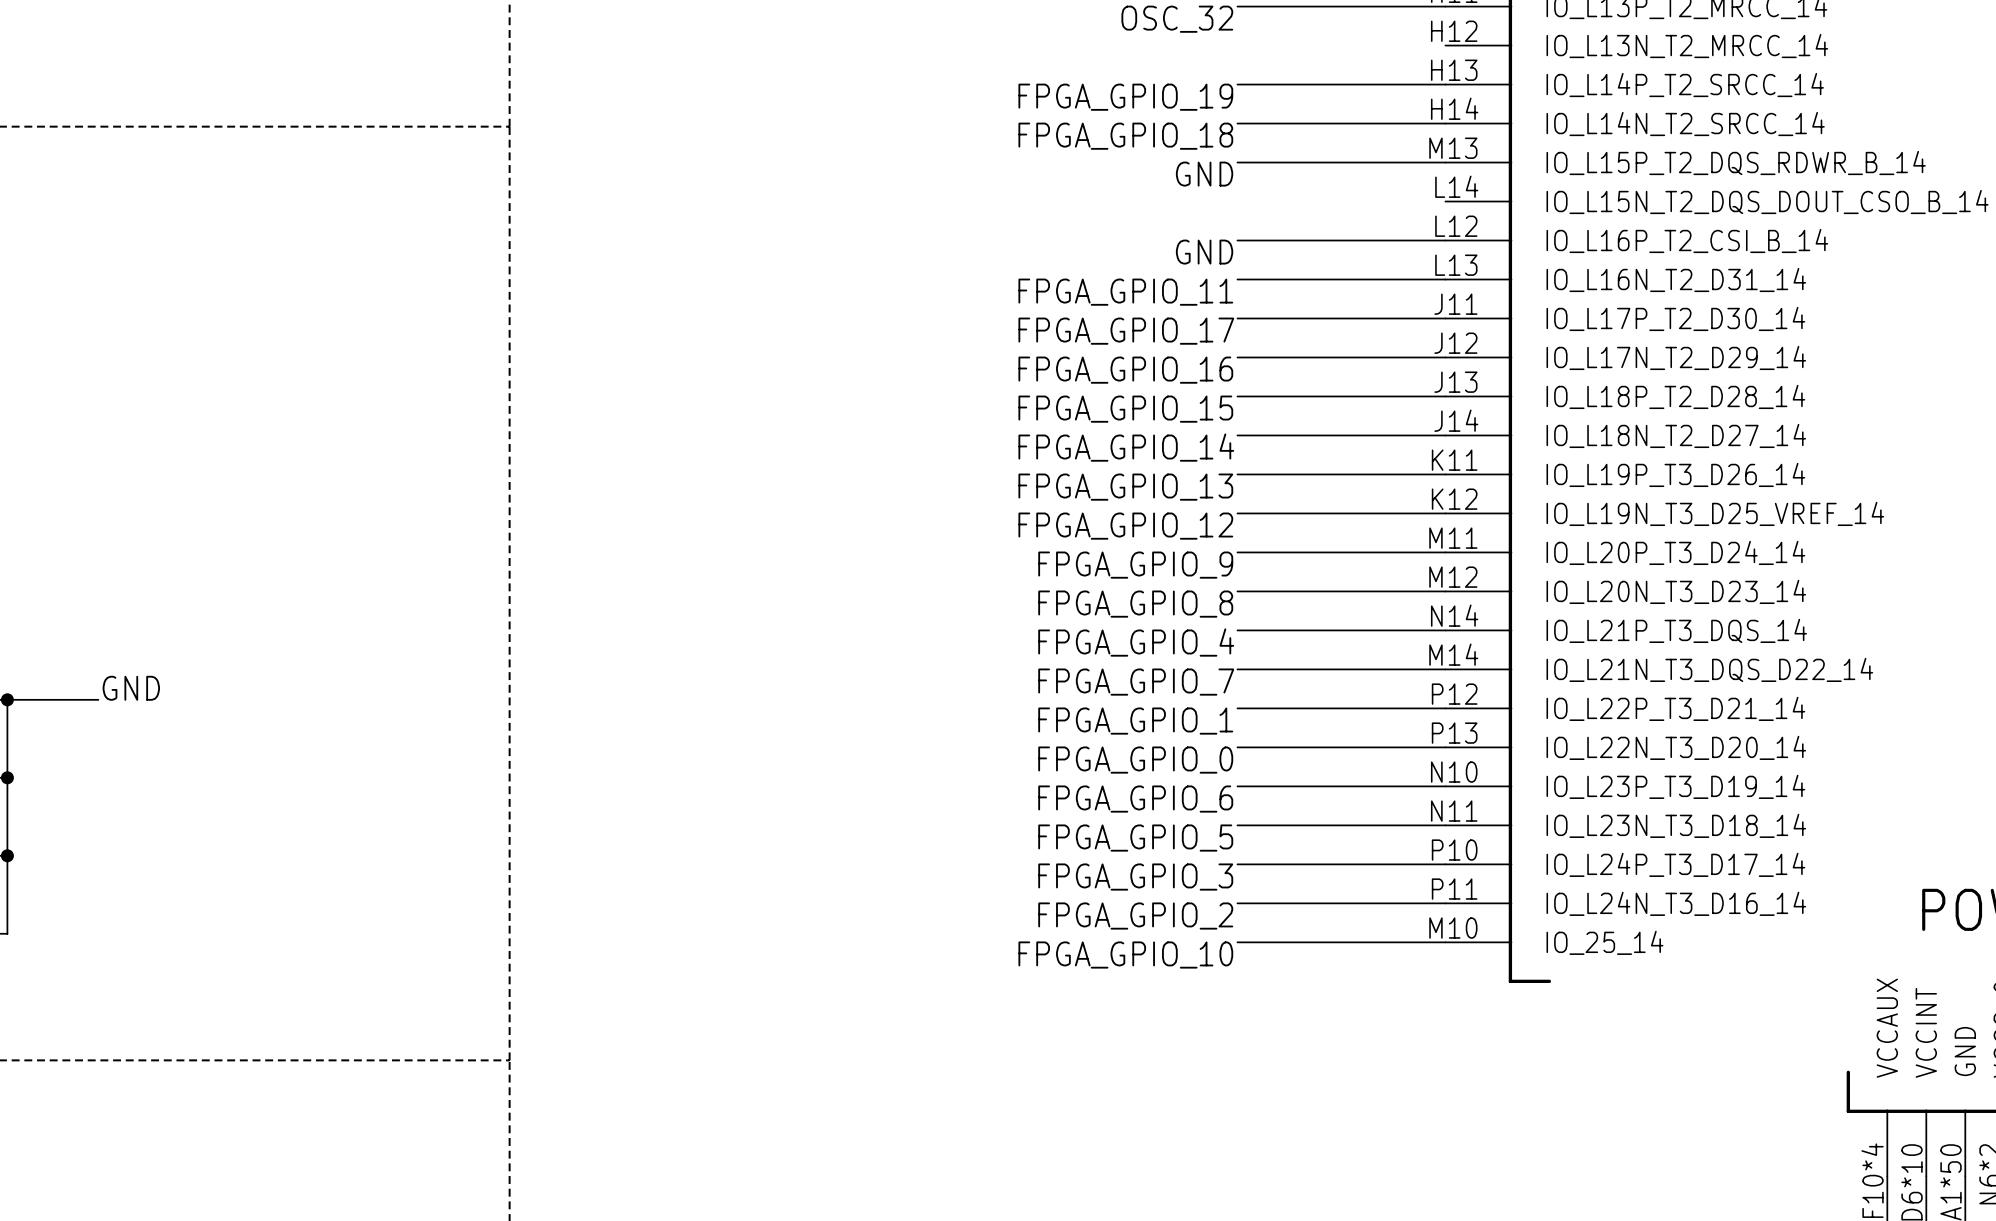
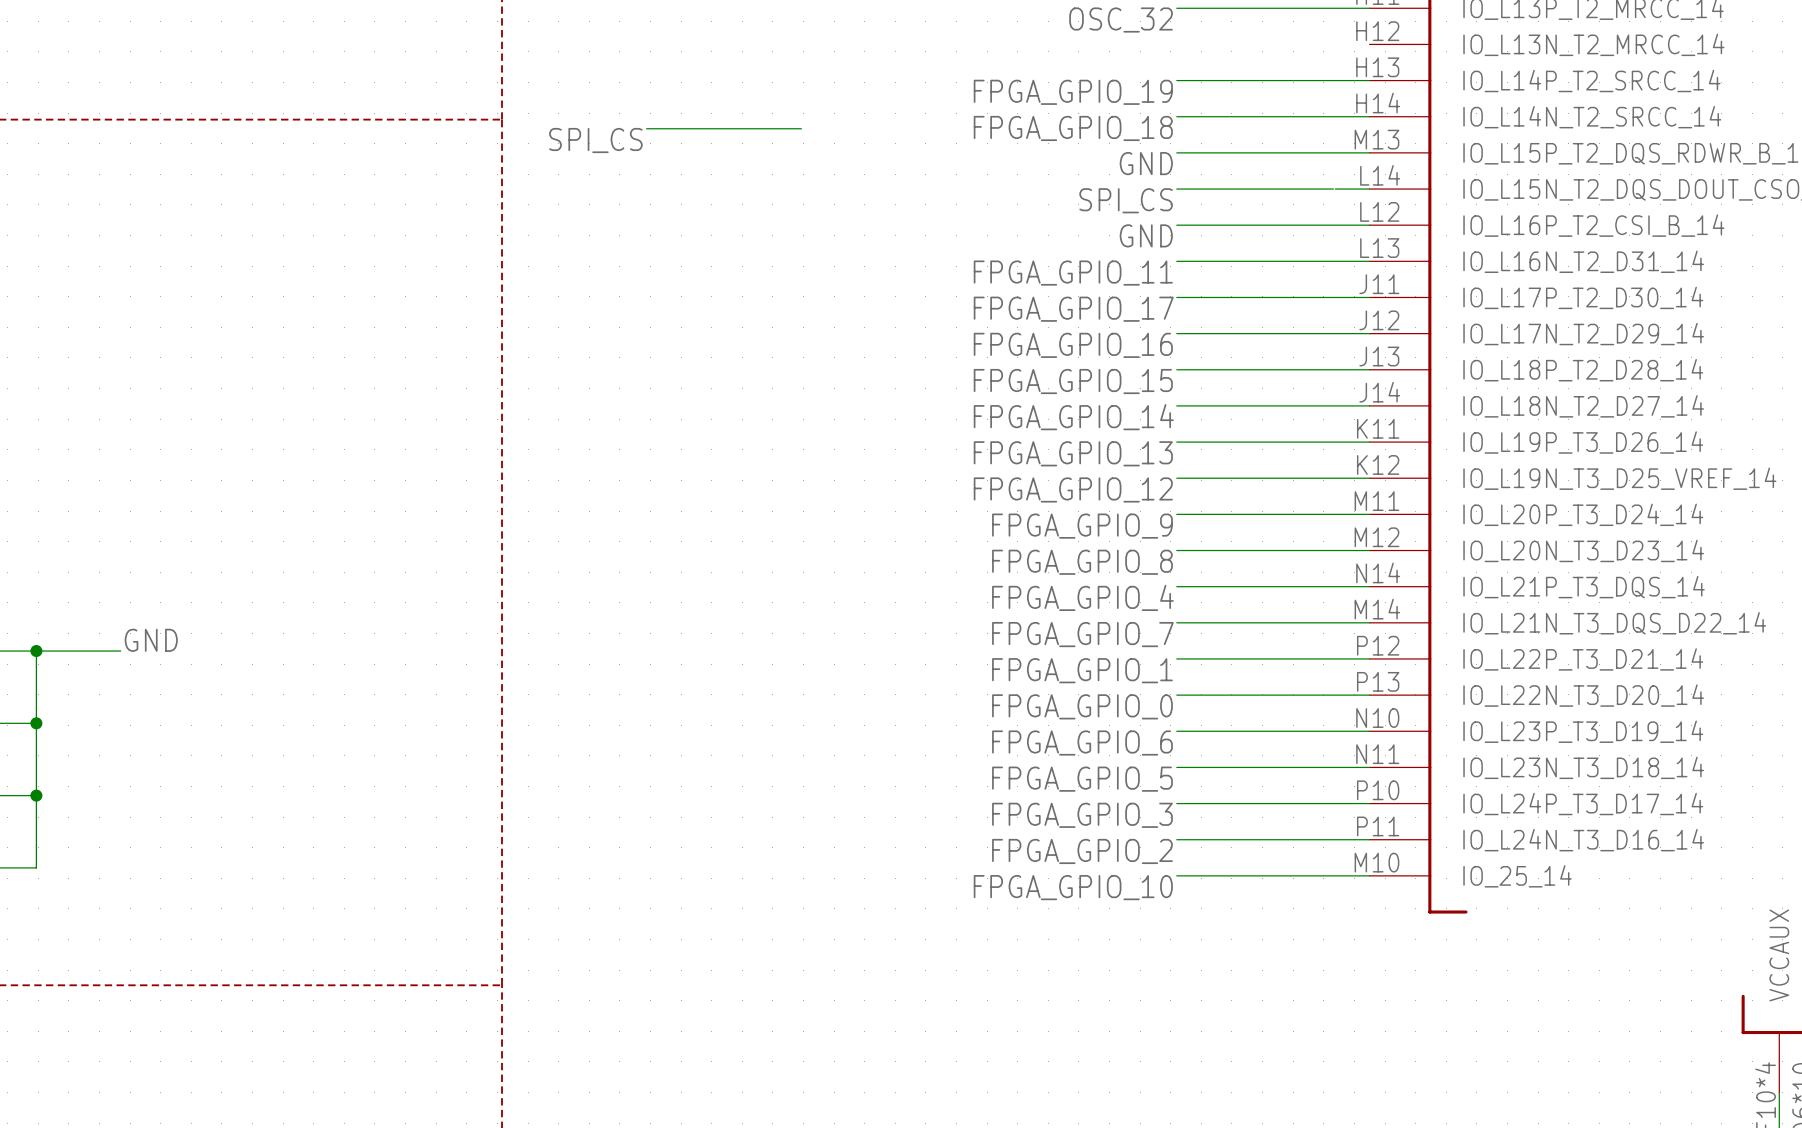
wire: none -> (646, 128) (801, 128)
label: none -> SPI_CS (595, 140)
wire: none -> (1176, 189) (1333, 189)
wire: none -> (1335, 189) (1369, 189)
label: none -> SPI_CS (1126, 200)

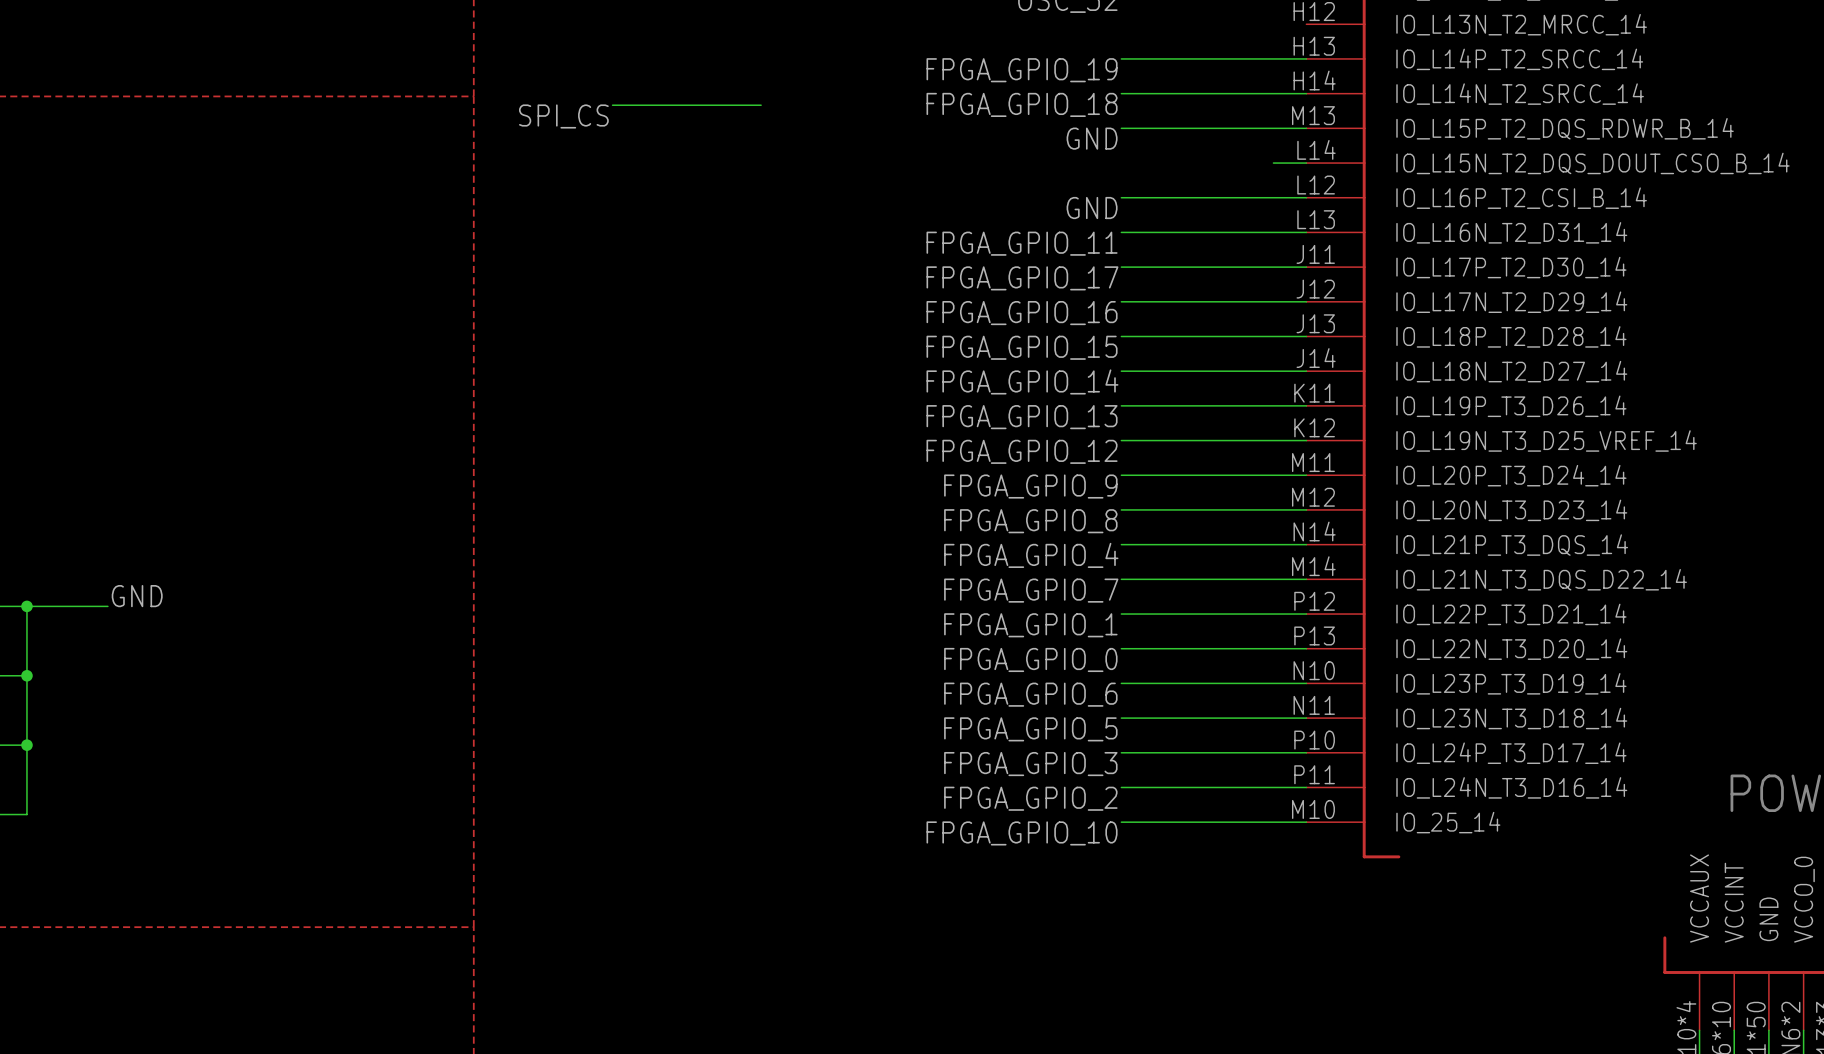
wire: (1176, 189) (1333, 189) -> none
label: SPI_CS (1126, 200) -> none

